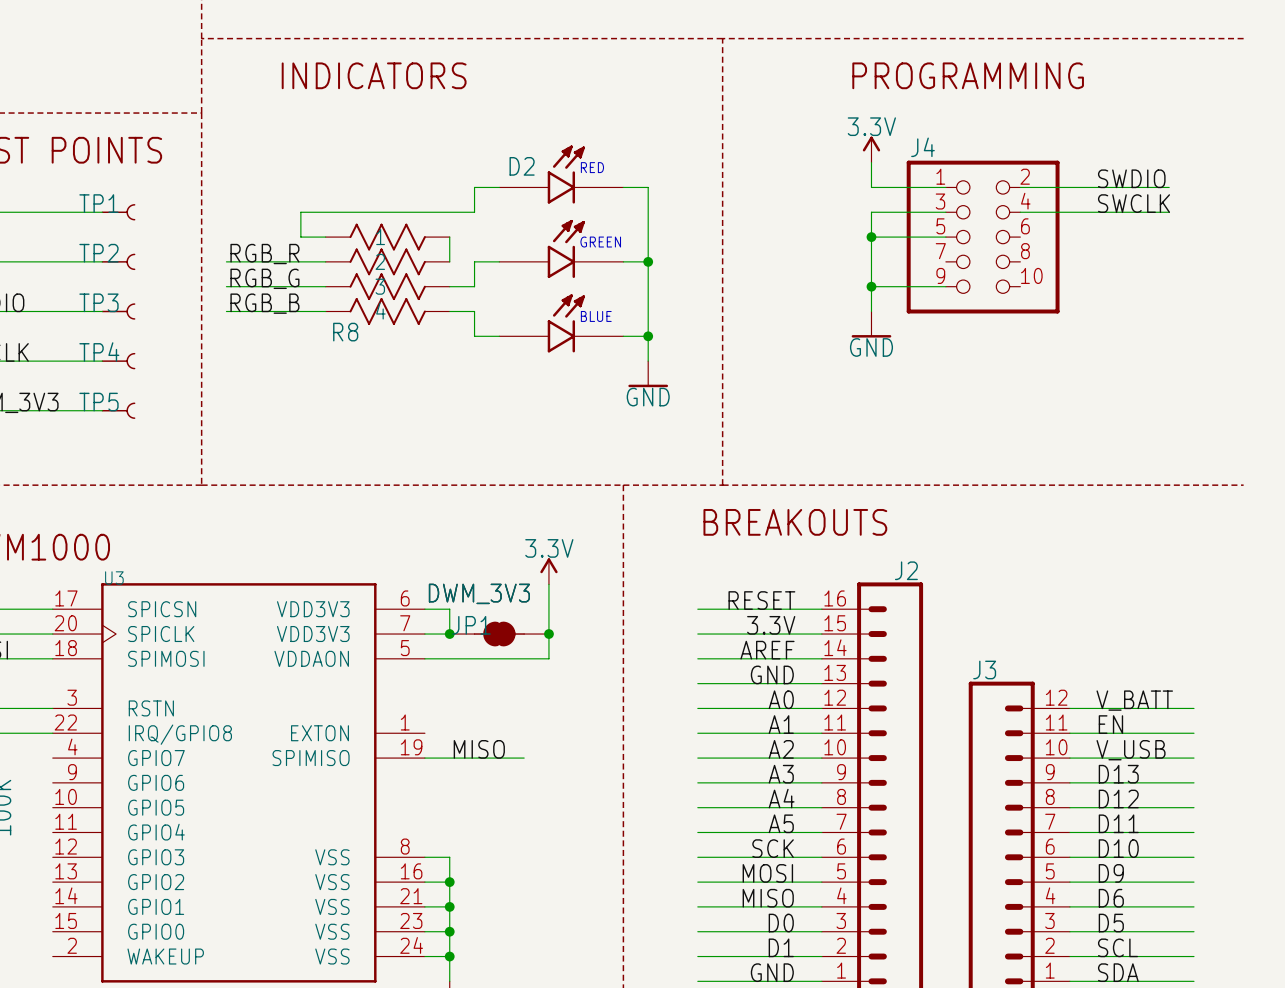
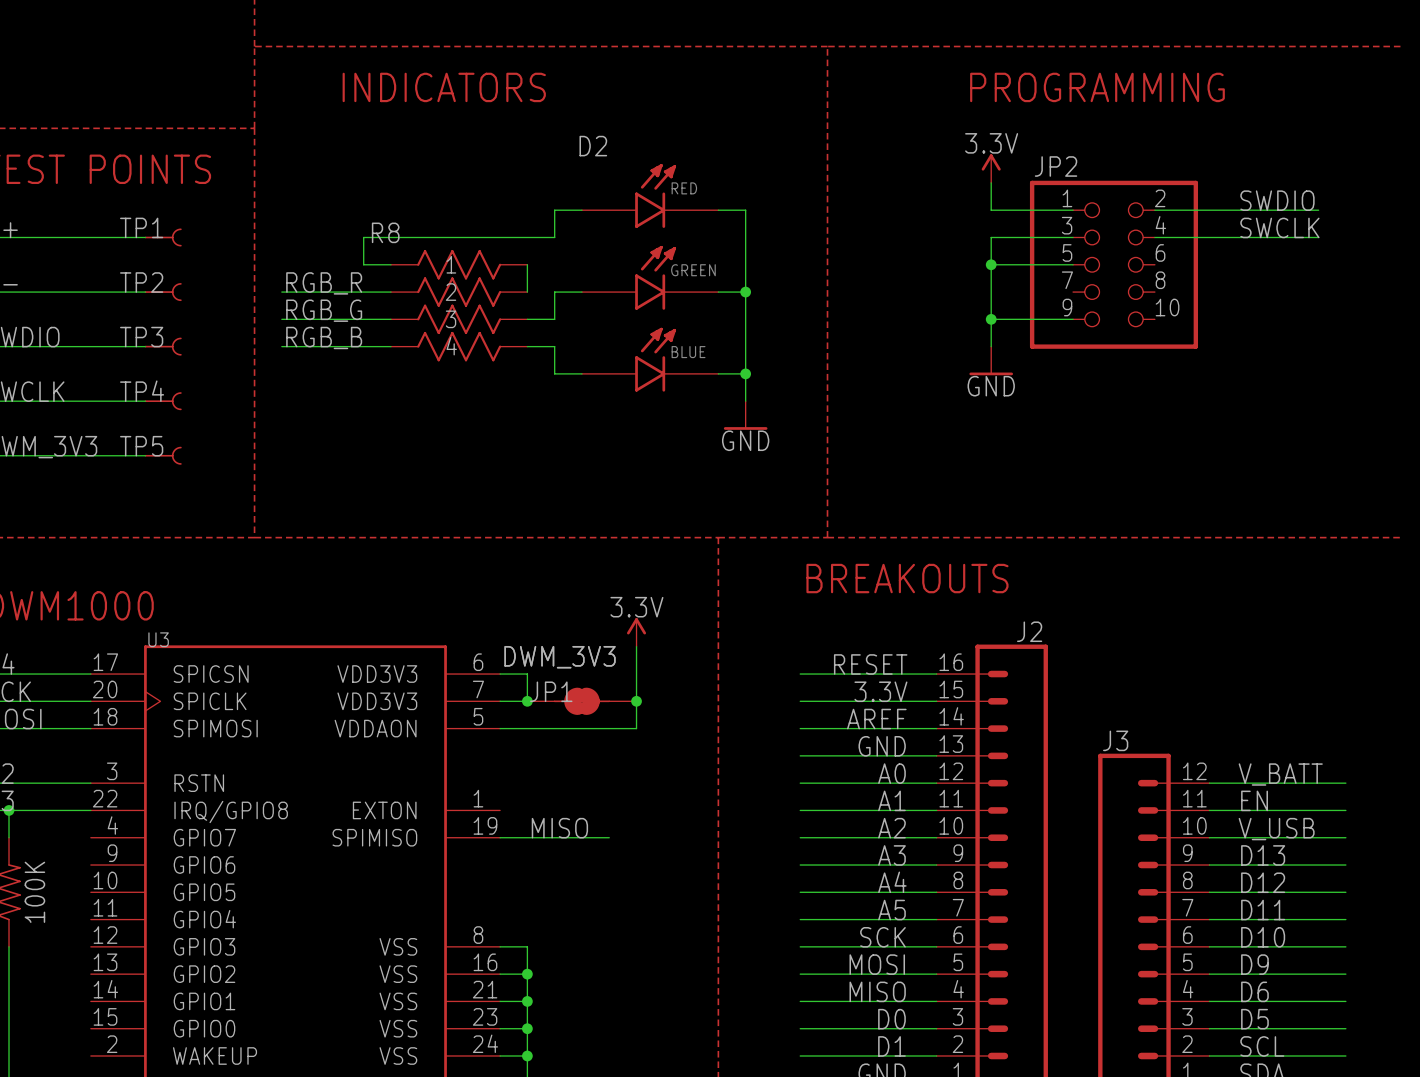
J4 name: J4 (922, 147) -> JP2 (1056, 166)
D2 name position: D2 (522, 166) -> D2 (593, 146)
R8 name position: R8 (345, 332) -> R8 (385, 232)

